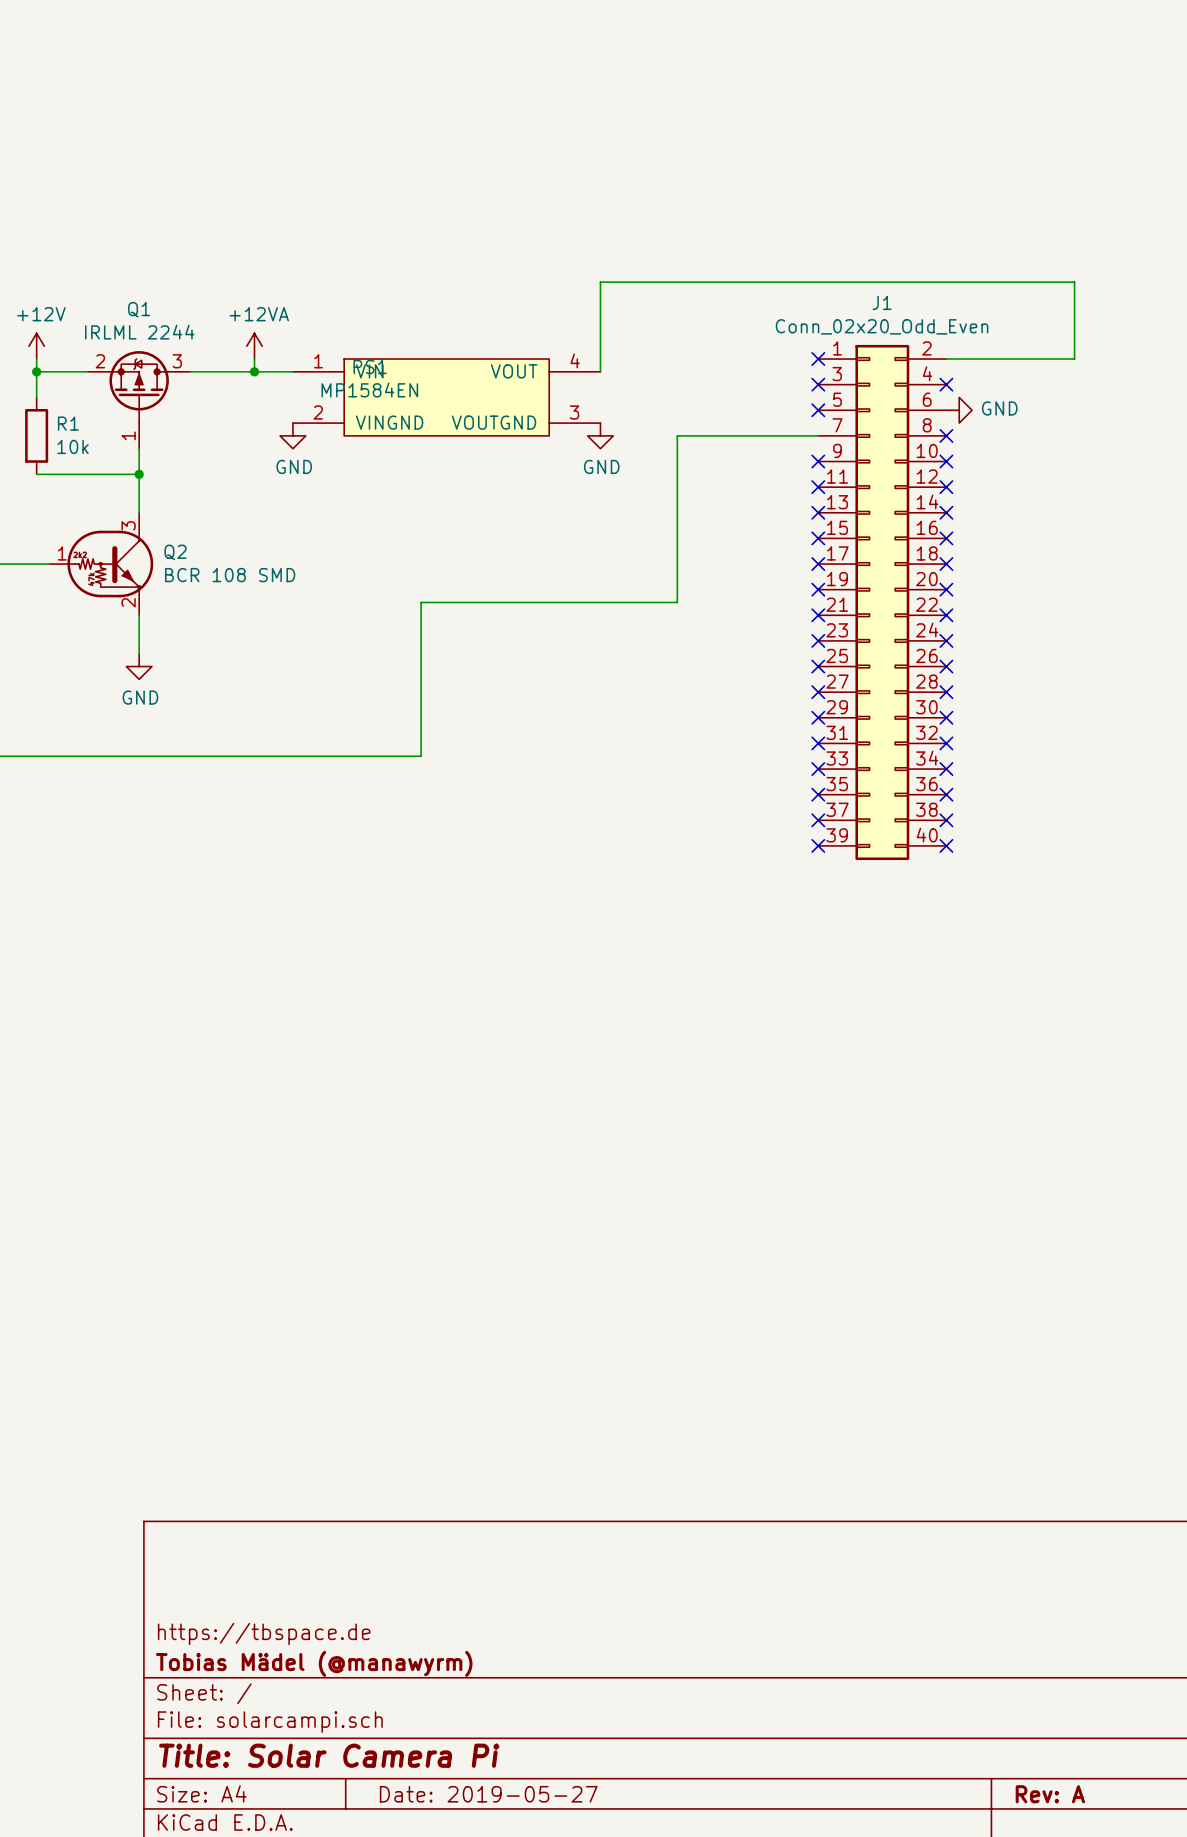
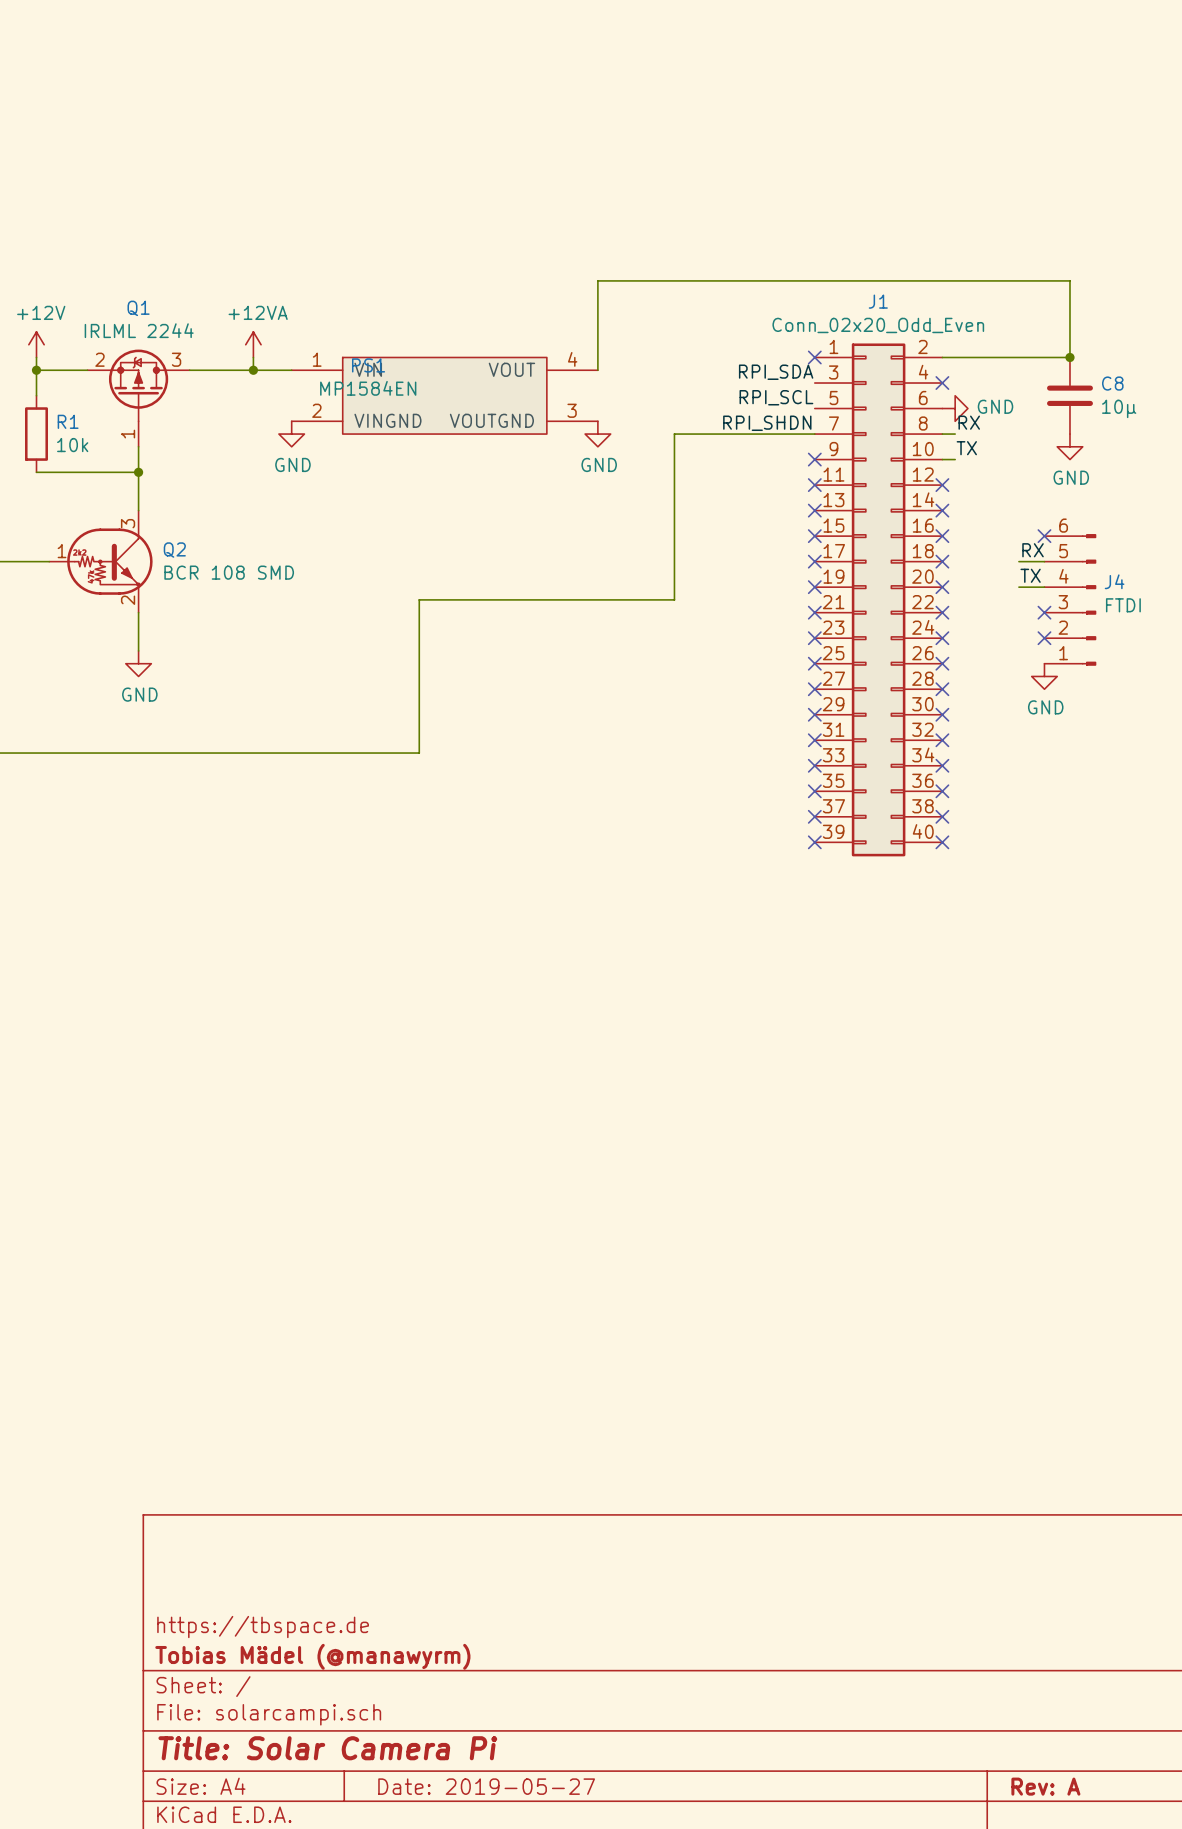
junction: none -> (1069, 357)
label: none -> RPI_SDA (776, 372)
no-connect mark: (818, 384) -> none
C8: none -> 10µ (1069, 395)
label: none -> RPI_SCL (776, 397)
no-connect mark: (818, 410) -> none
label: none -> RX (969, 422)
label: none -> RPI_SHDN (767, 423)
wire: none -> (942, 434) (955, 434)
no-connect mark: (946, 435) -> none
power symbol: none -> GND (1069, 446)
label: none -> TX (966, 448)
wire: none -> (942, 459) (955, 459)
no-connect mark: (946, 461) -> none
no-connect mark: none -> (1044, 536)
label: none -> RX (1033, 550)
wire: none -> (1018, 561) (1044, 561)
label: none -> TX (1030, 575)
wire: none -> (1018, 587) (1044, 587)
J4: none -> FTDI (1070, 599)
no-connect mark: none -> (1044, 612)
no-connect mark: none -> (1044, 638)
power symbol: none -> GND (1044, 676)

